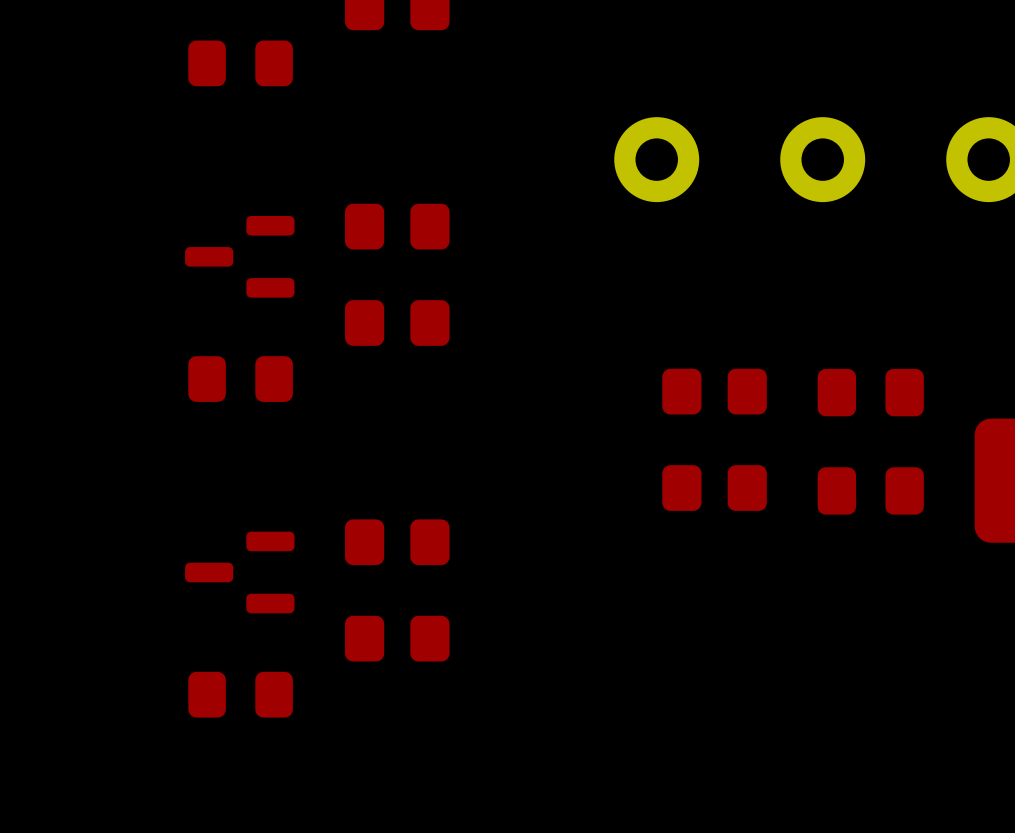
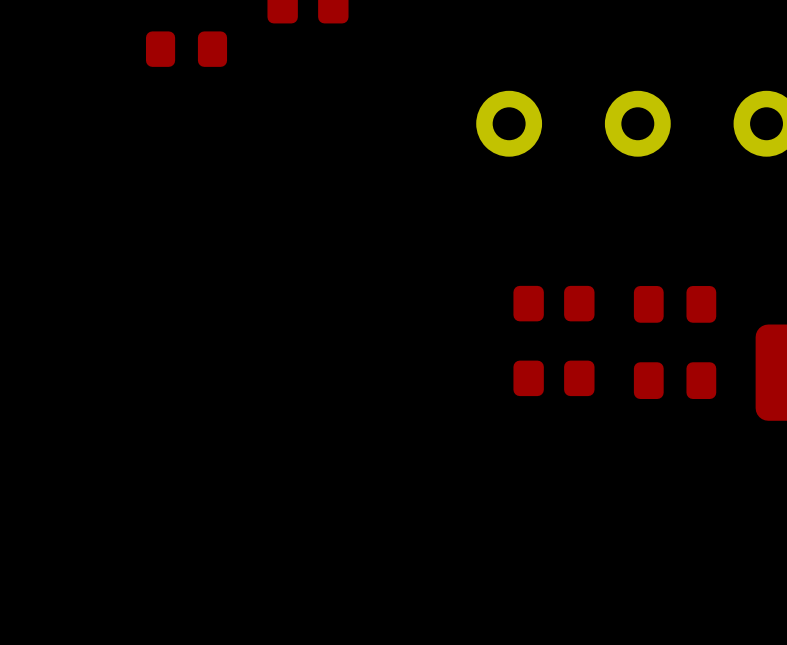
part: (397, 226) -> none
part: (239, 256) -> none
part: (397, 323) -> none
part: (240, 379) -> none
part: (397, 542) -> none
part: (239, 572) -> none
part: (397, 638) -> none
part: (240, 694) -> none

